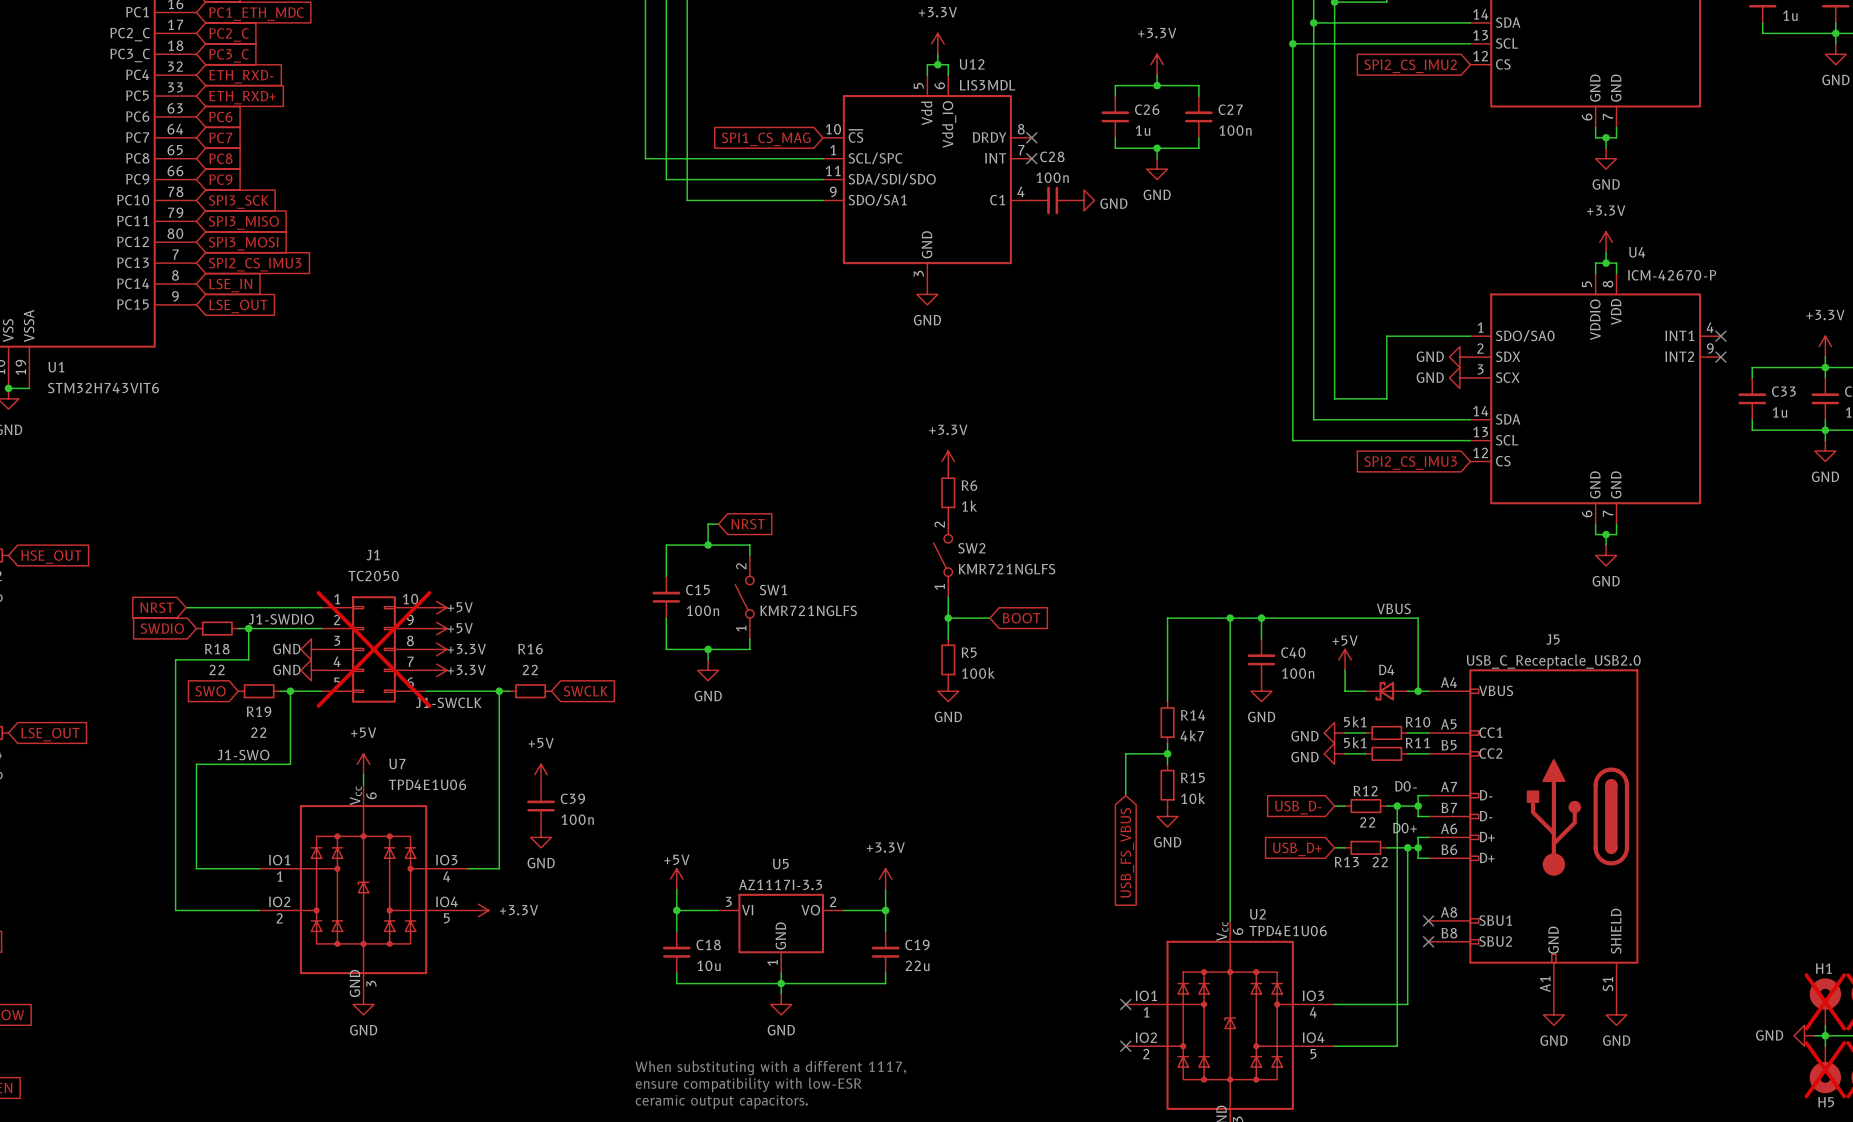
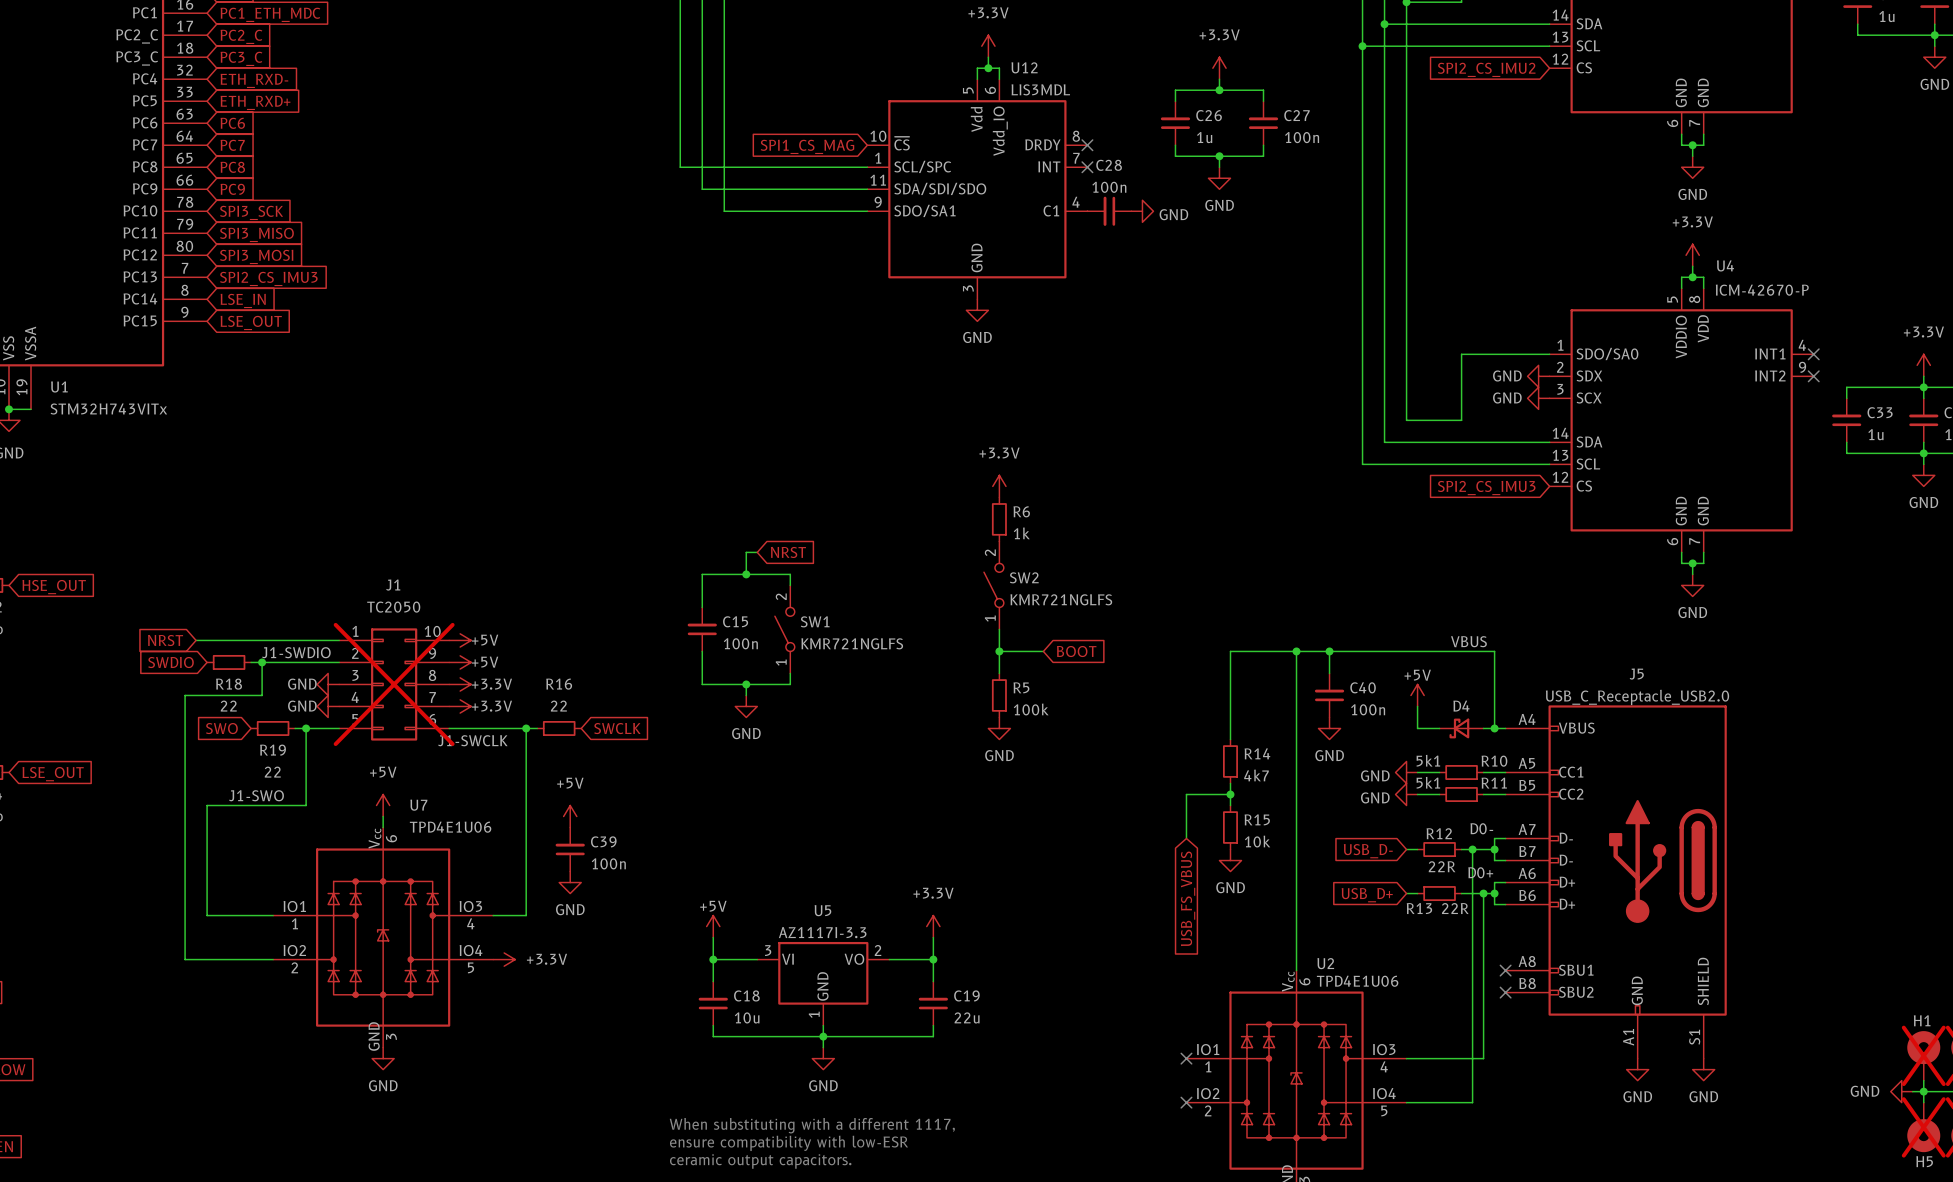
U1 value: STM32H743VIT6 (103, 388) -> STM32H743VITx (108, 409)
R12 value: 22 (1367, 822) -> 22R (1442, 866)
R13 value: 22 (1380, 862) -> 22R (1455, 908)

